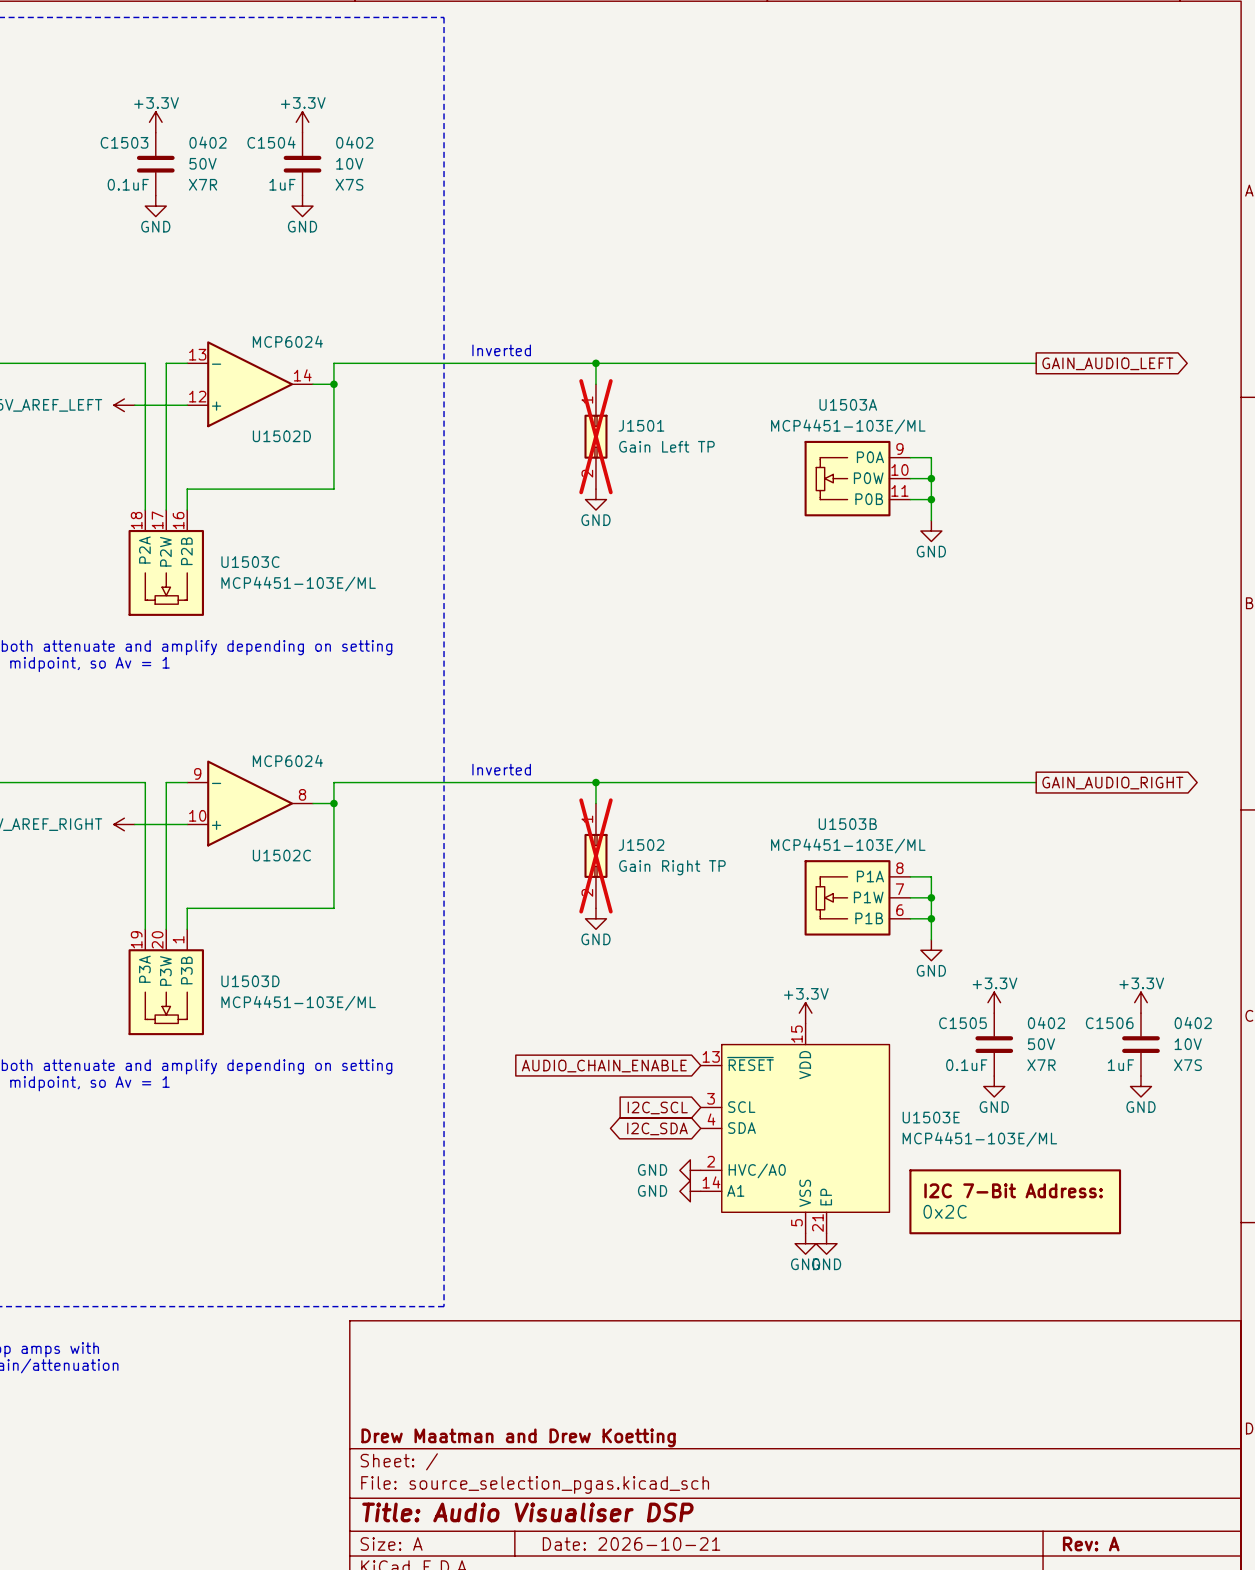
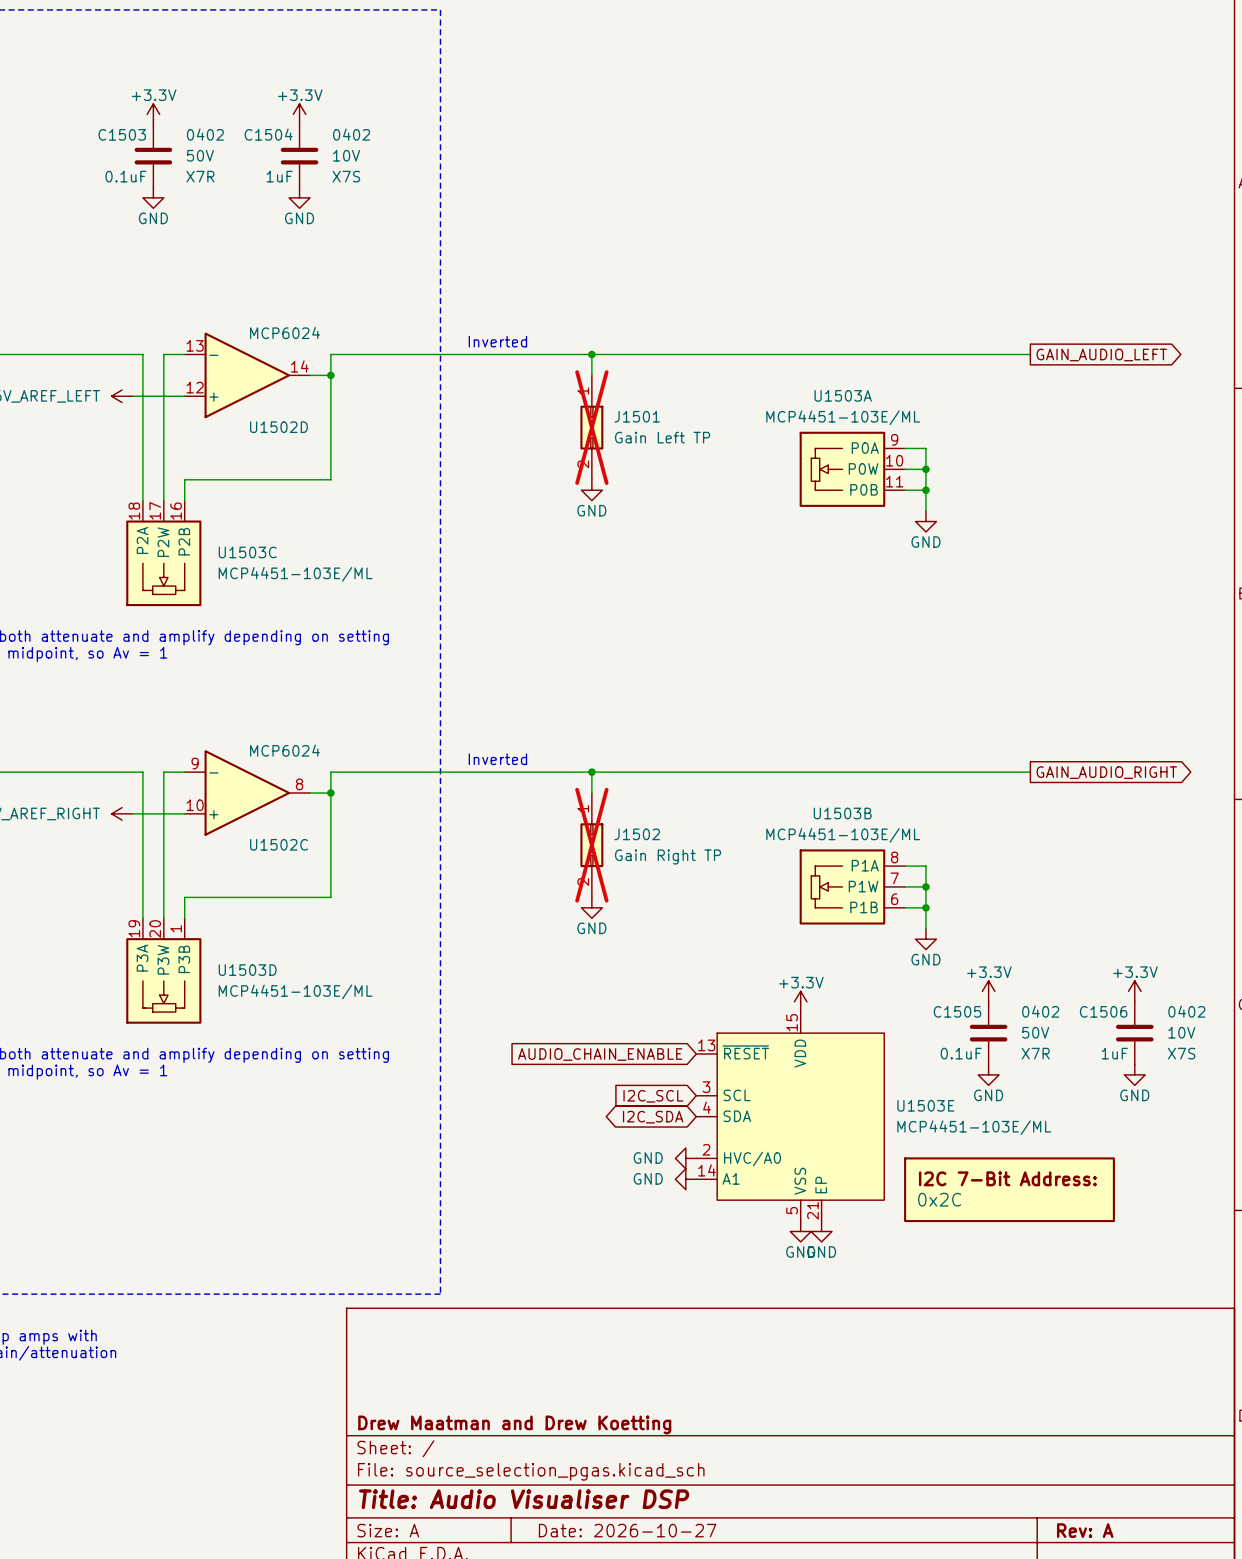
title block: Date: 2026-10-21 (631, 1543) -> Date: 2026-10-27 (627, 1530)

